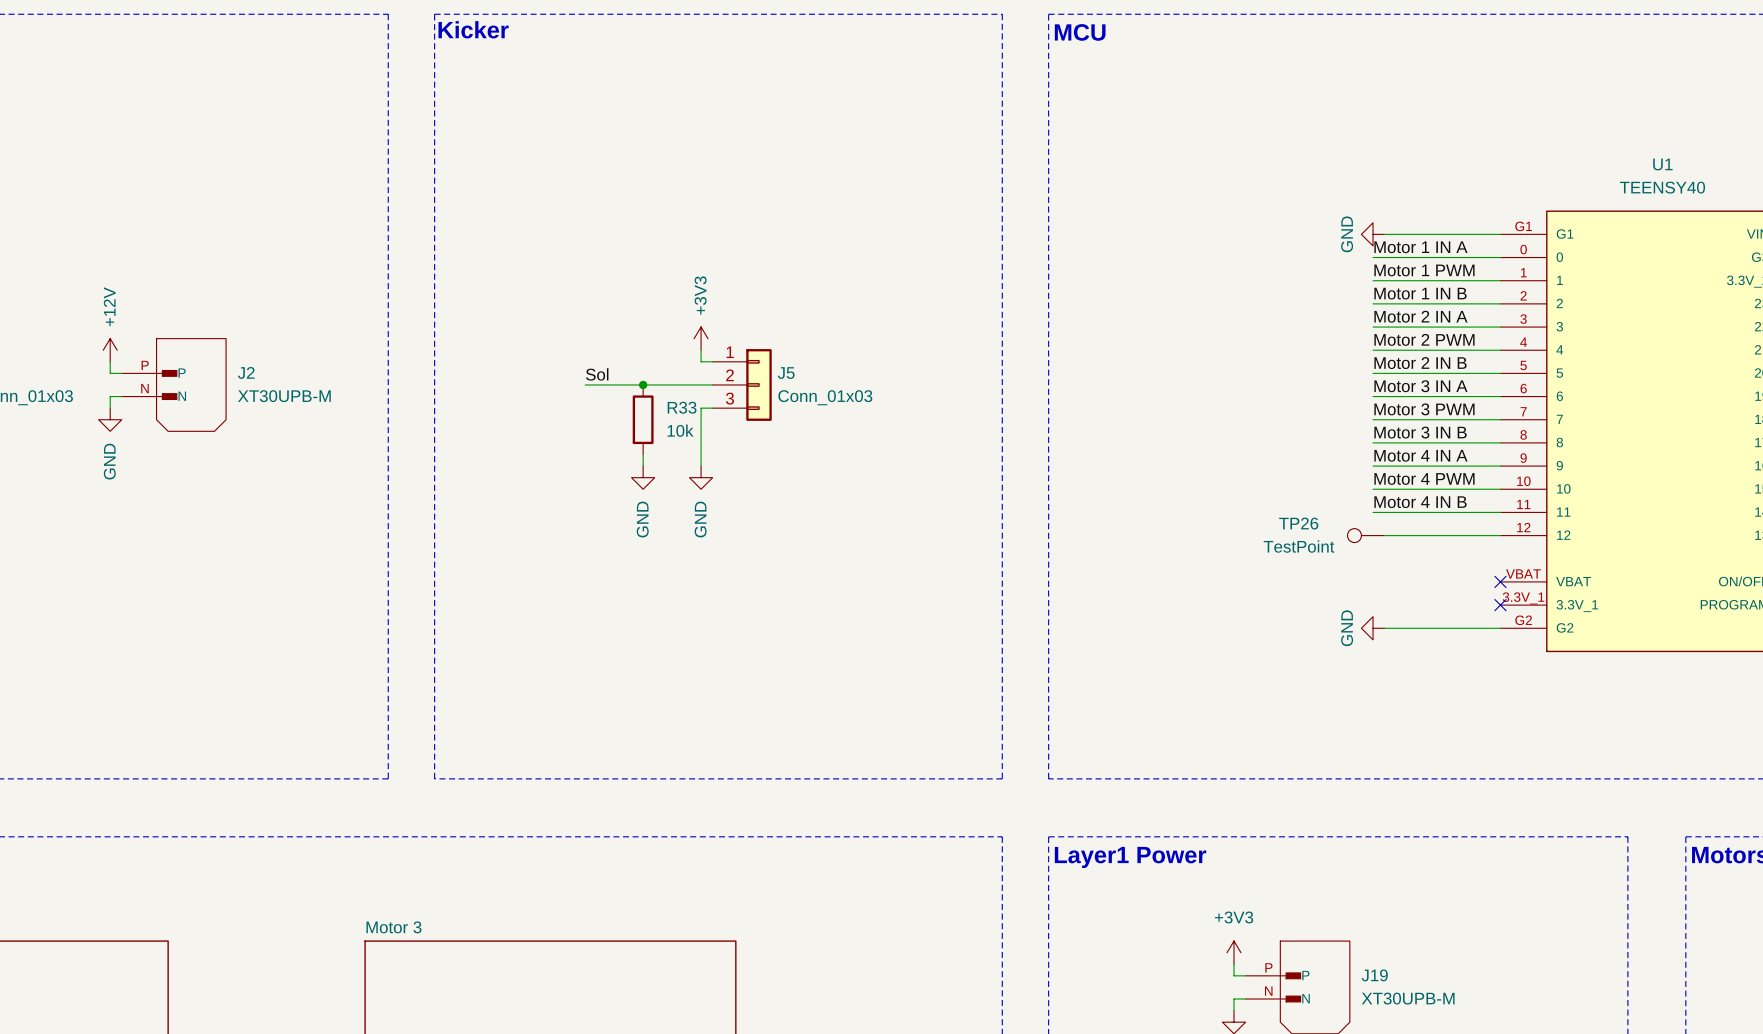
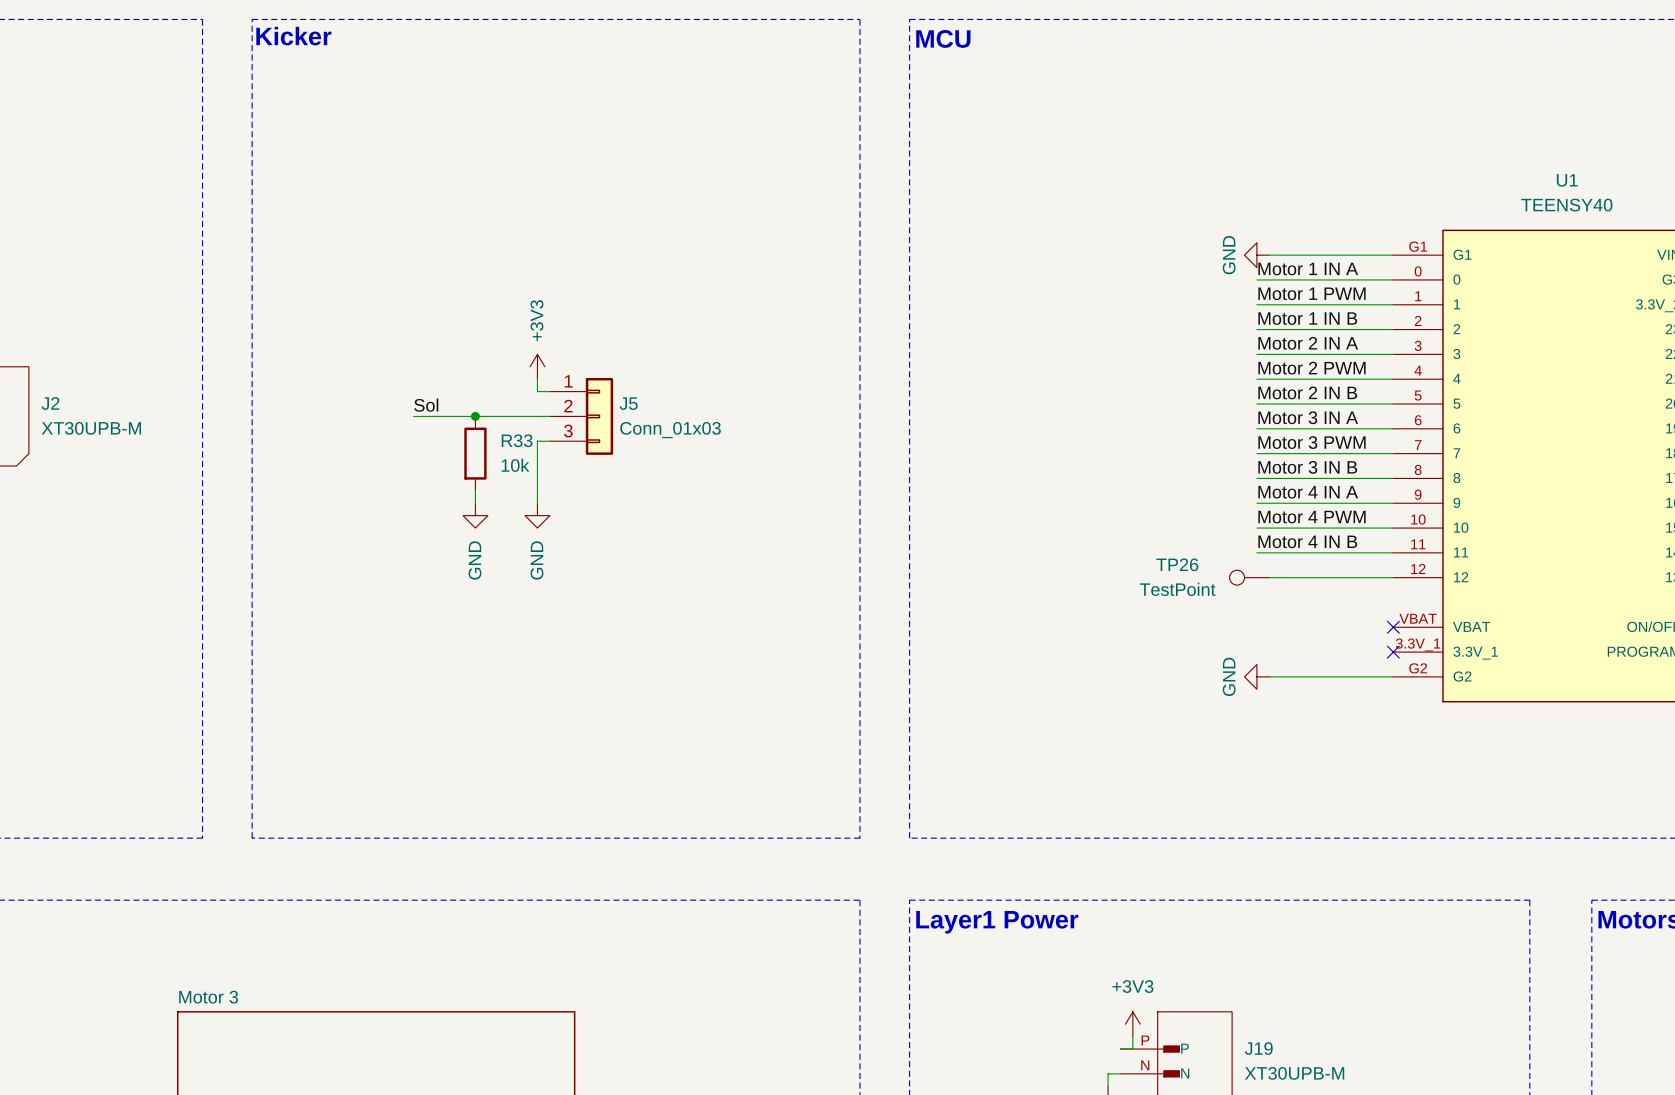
power symbol position: +3V3 (1234, 952) -> +3V3 (1132, 1024)
wire: (1234, 964) (1234, 975) (1245, 975) -> (1132, 1036) (1132, 1049) (1120, 1049)

